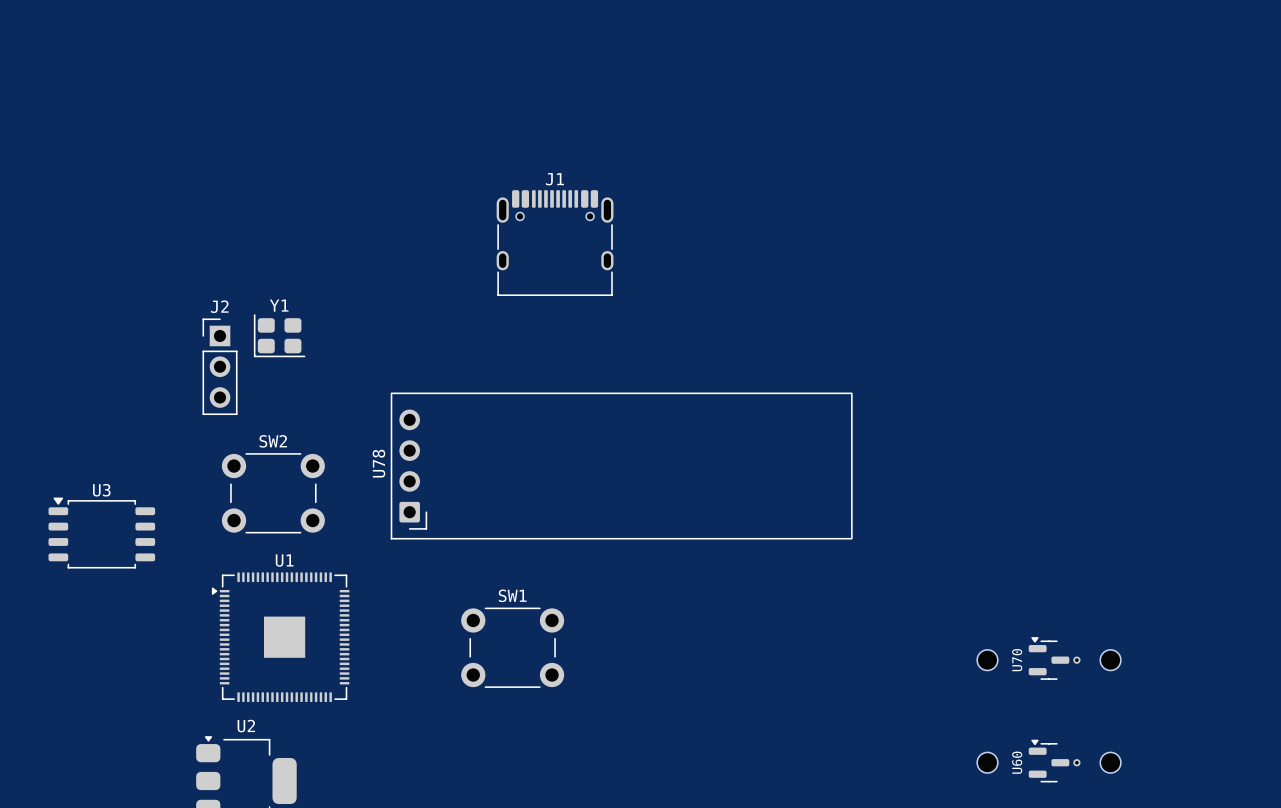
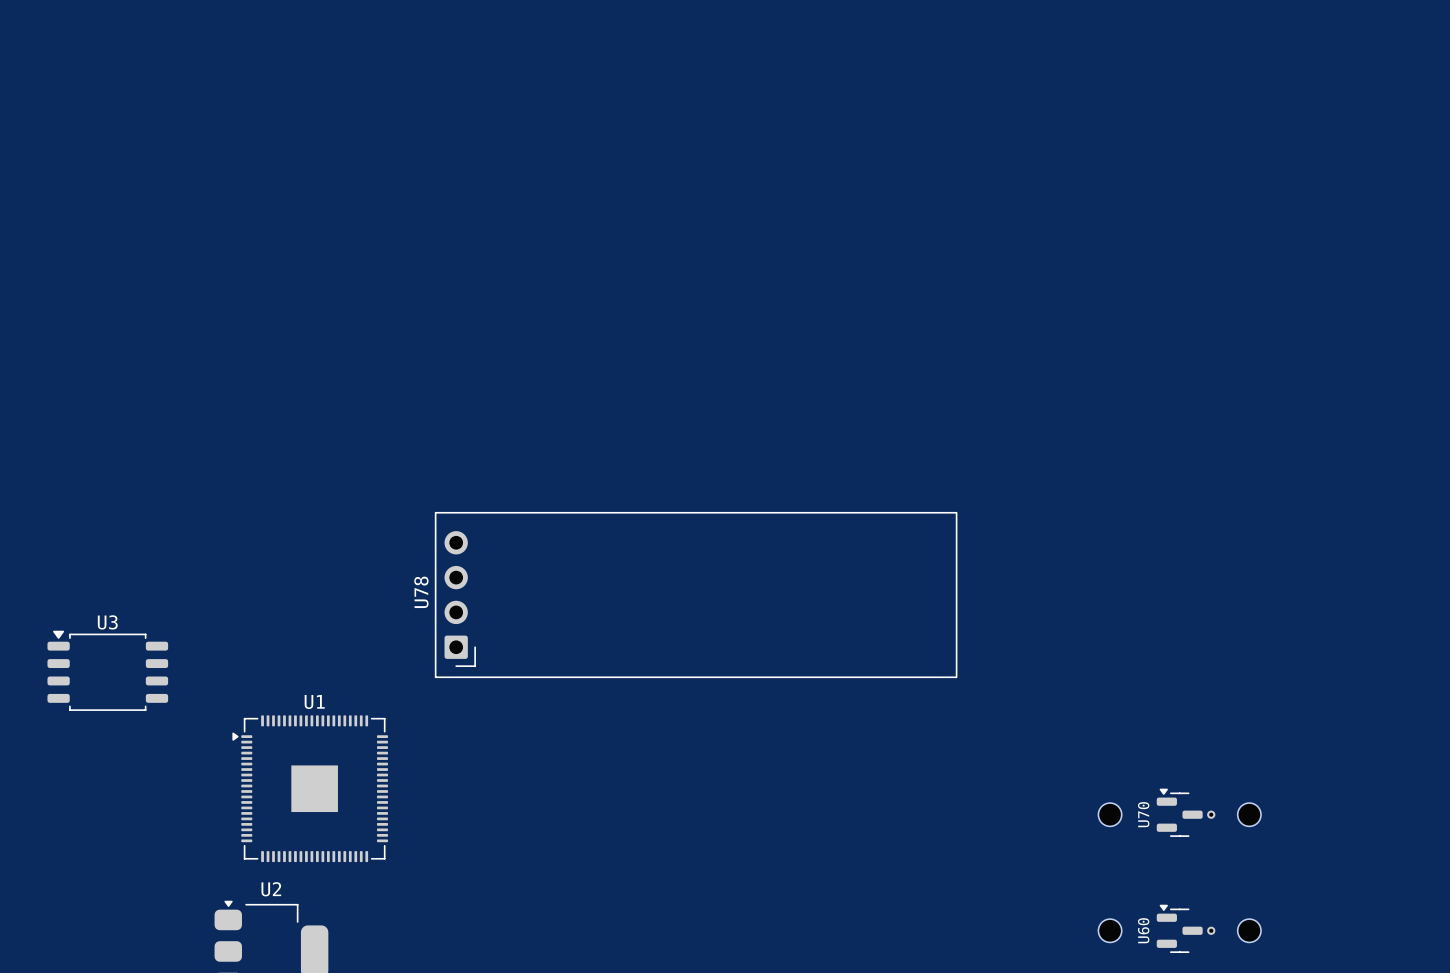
J1: (555, 243) -> none
Y1: (279, 335) -> none
J2: (220, 366) -> none
SW2: (273, 493) -> none
SW1: (512, 647) -> none

